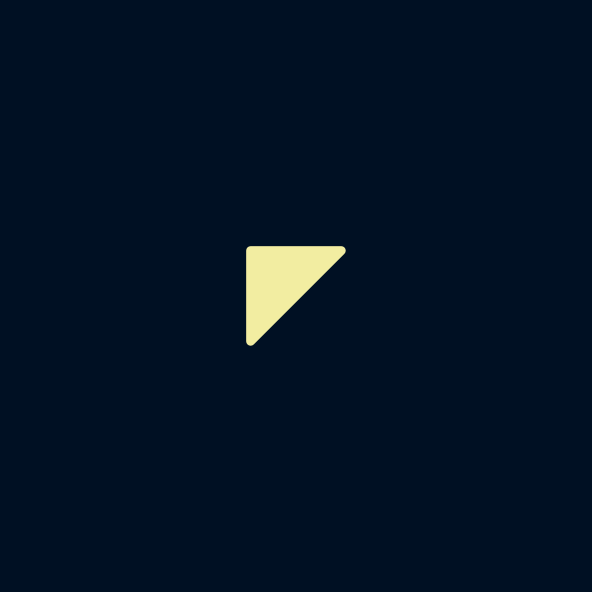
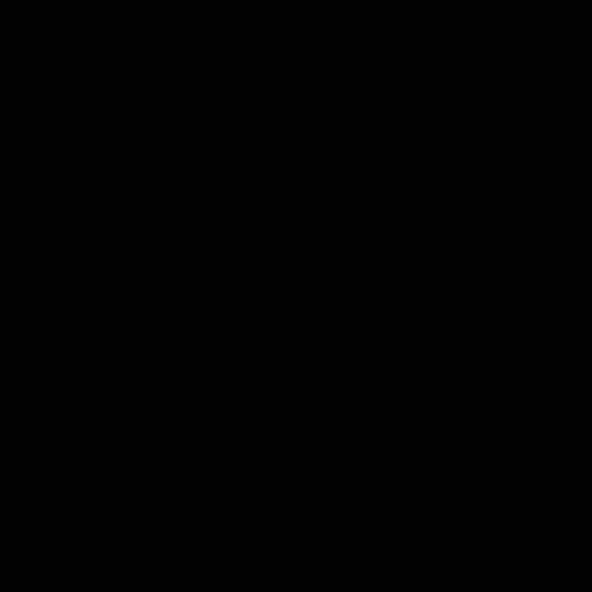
drawing: [246, 246, 346, 346] -> none

